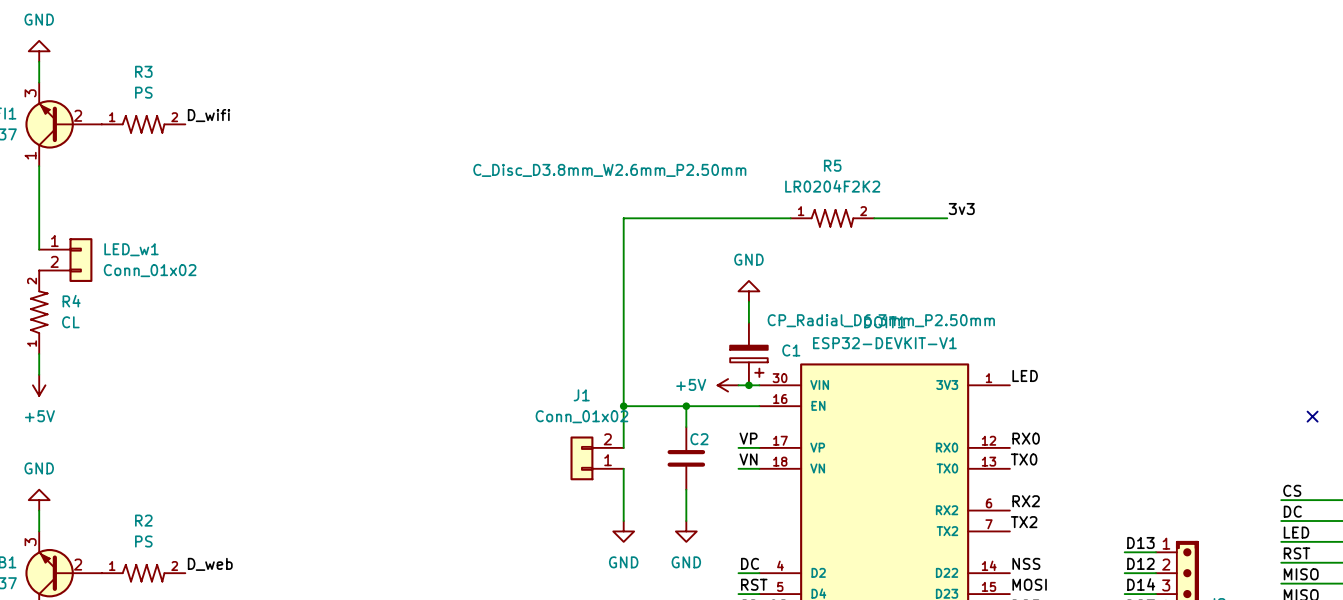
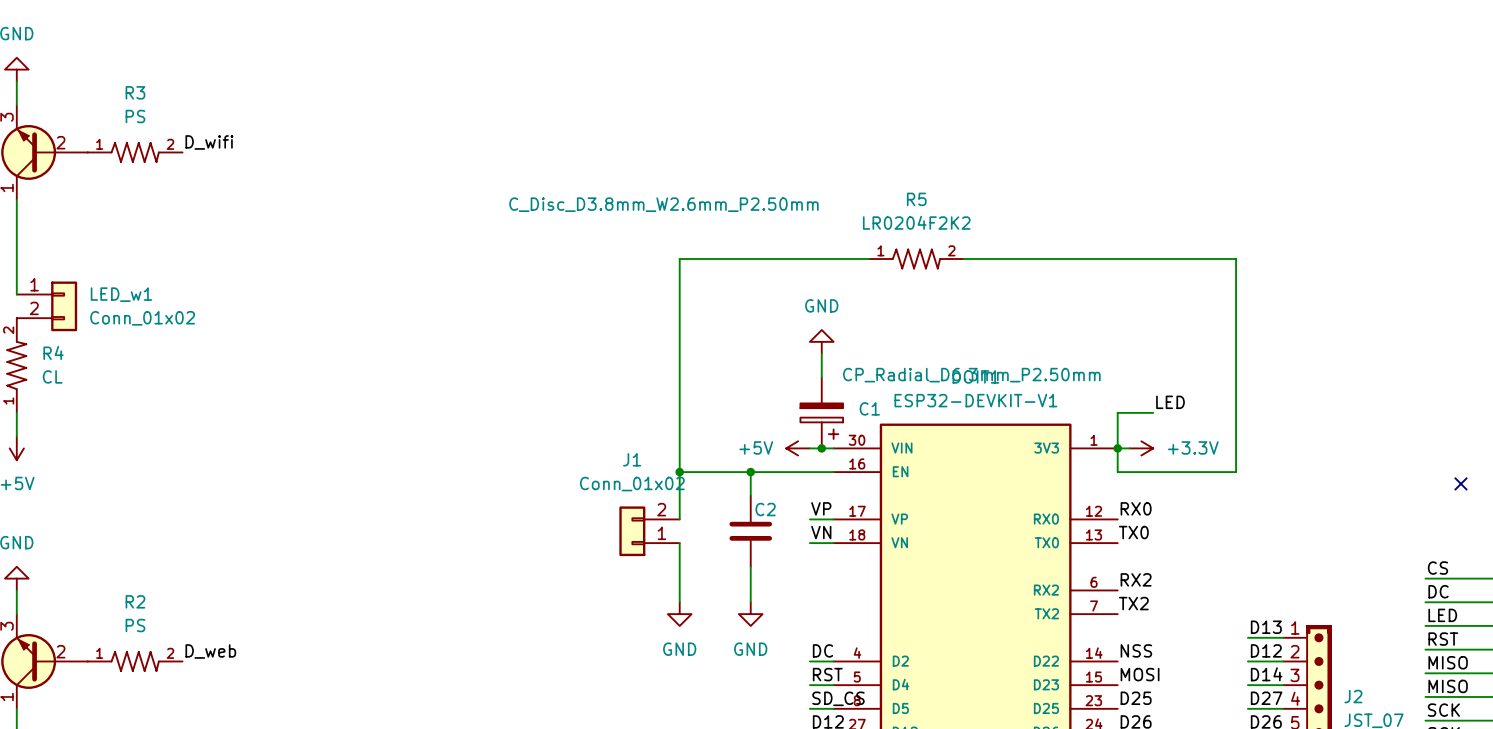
label: 3v3 (961, 208) -> none
wire: none -> (1046, 259) (1236, 259) (1236, 472) (1117, 472) (1117, 412) (1153, 412)
label position: LED (1025, 375) -> LED (1170, 402)
wire: none -> (1117, 448) (1129, 448)
junction: none -> (1117, 448)
power symbol: none -> +3.3V (1141, 448)

